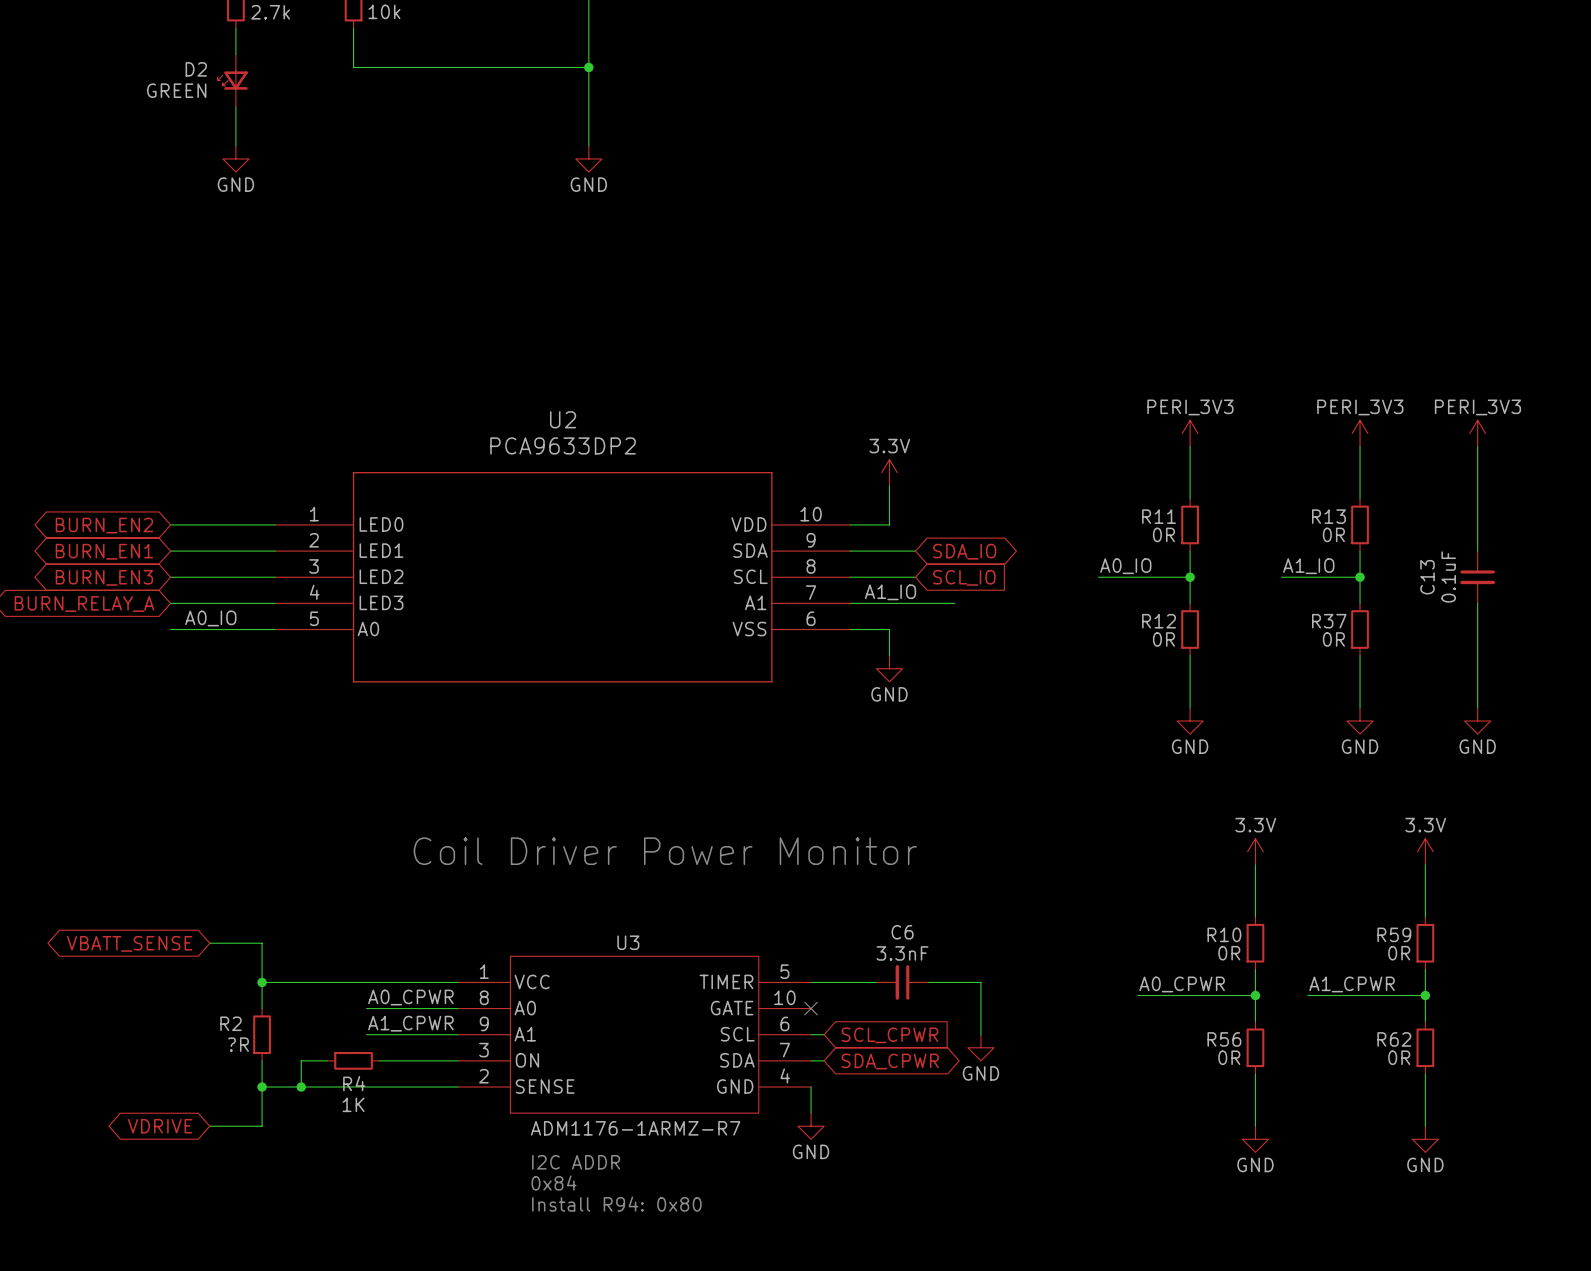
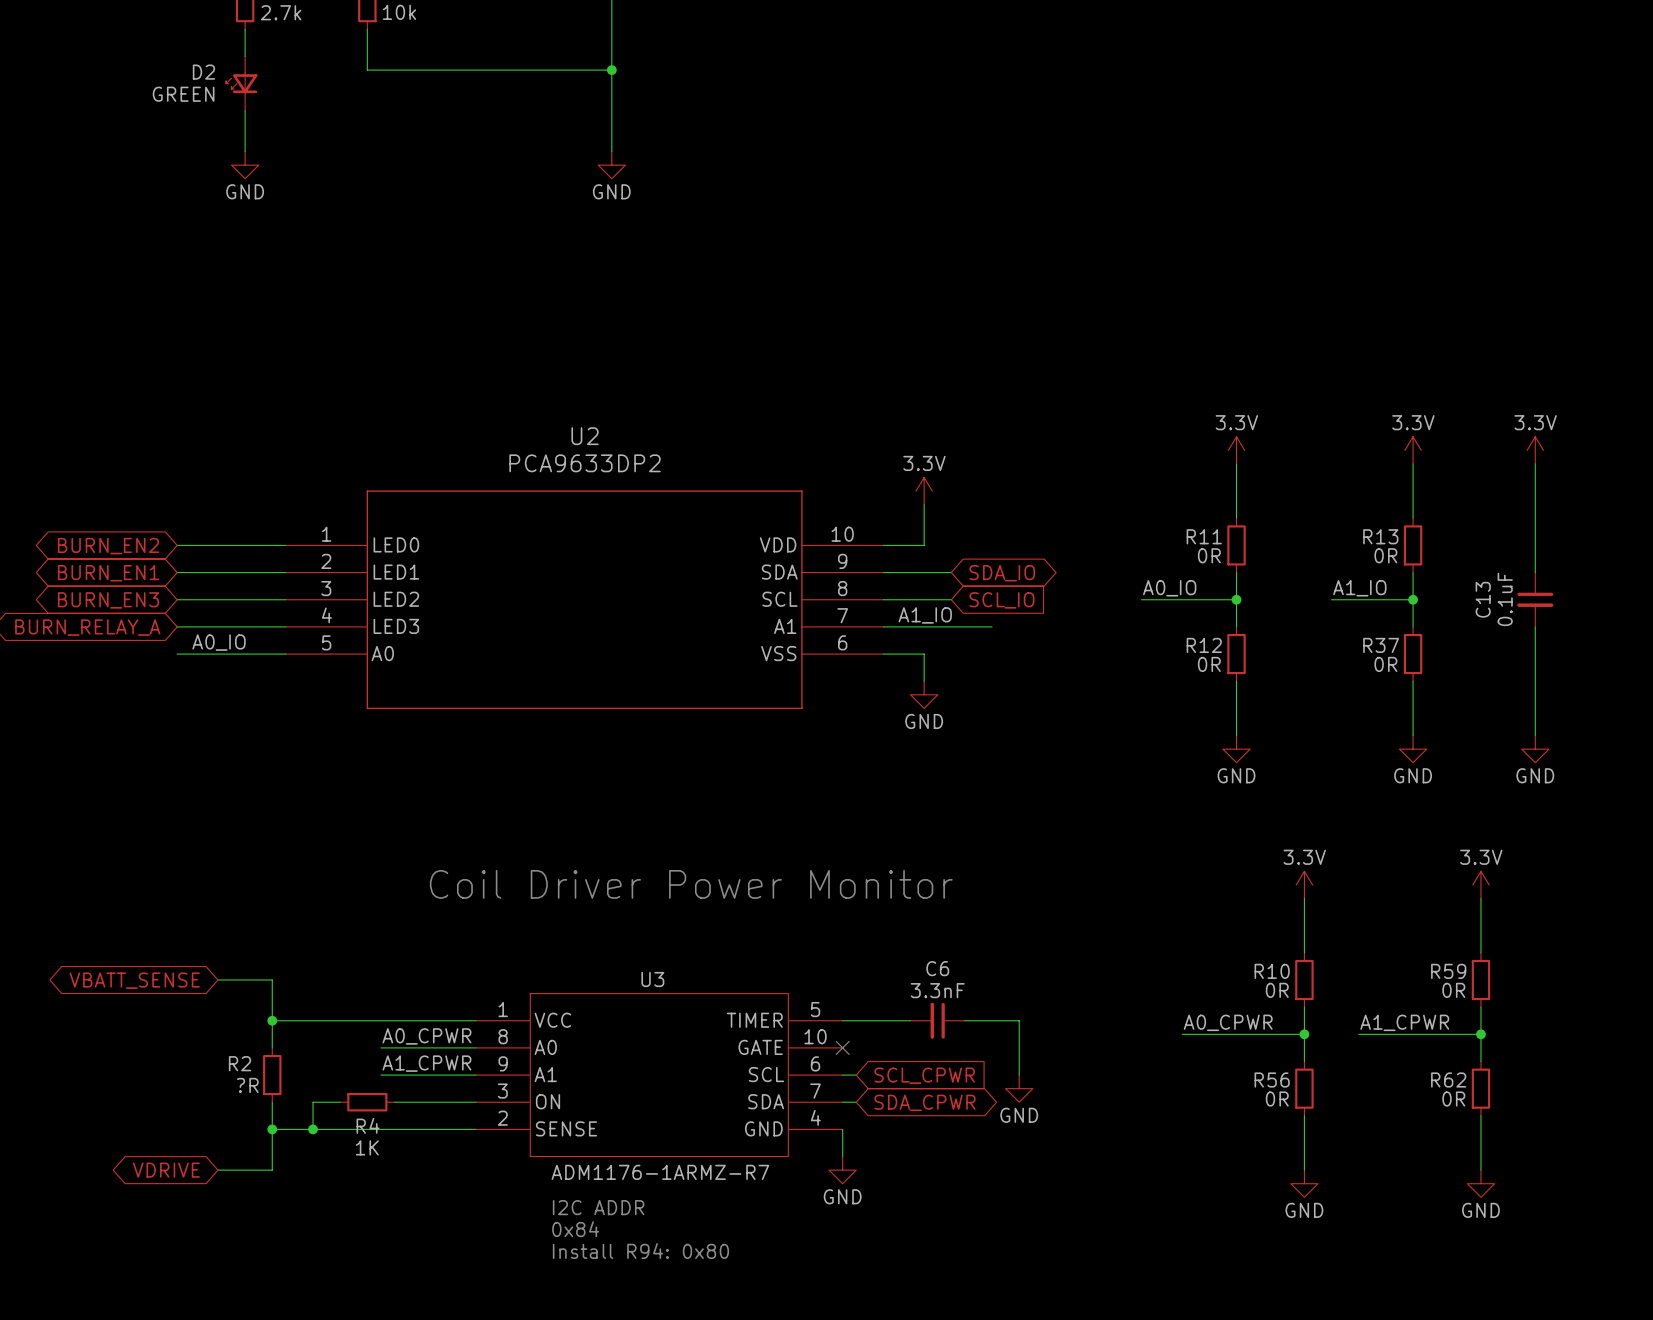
power symbol: PERI_3V3 (1190, 433) -> 3.3V (1236, 450)
power symbol: PERI_3V3 (1360, 433) -> 3.3V (1413, 450)
power symbol: PERI_3V3 (1477, 433) -> 3.3V (1535, 450)

